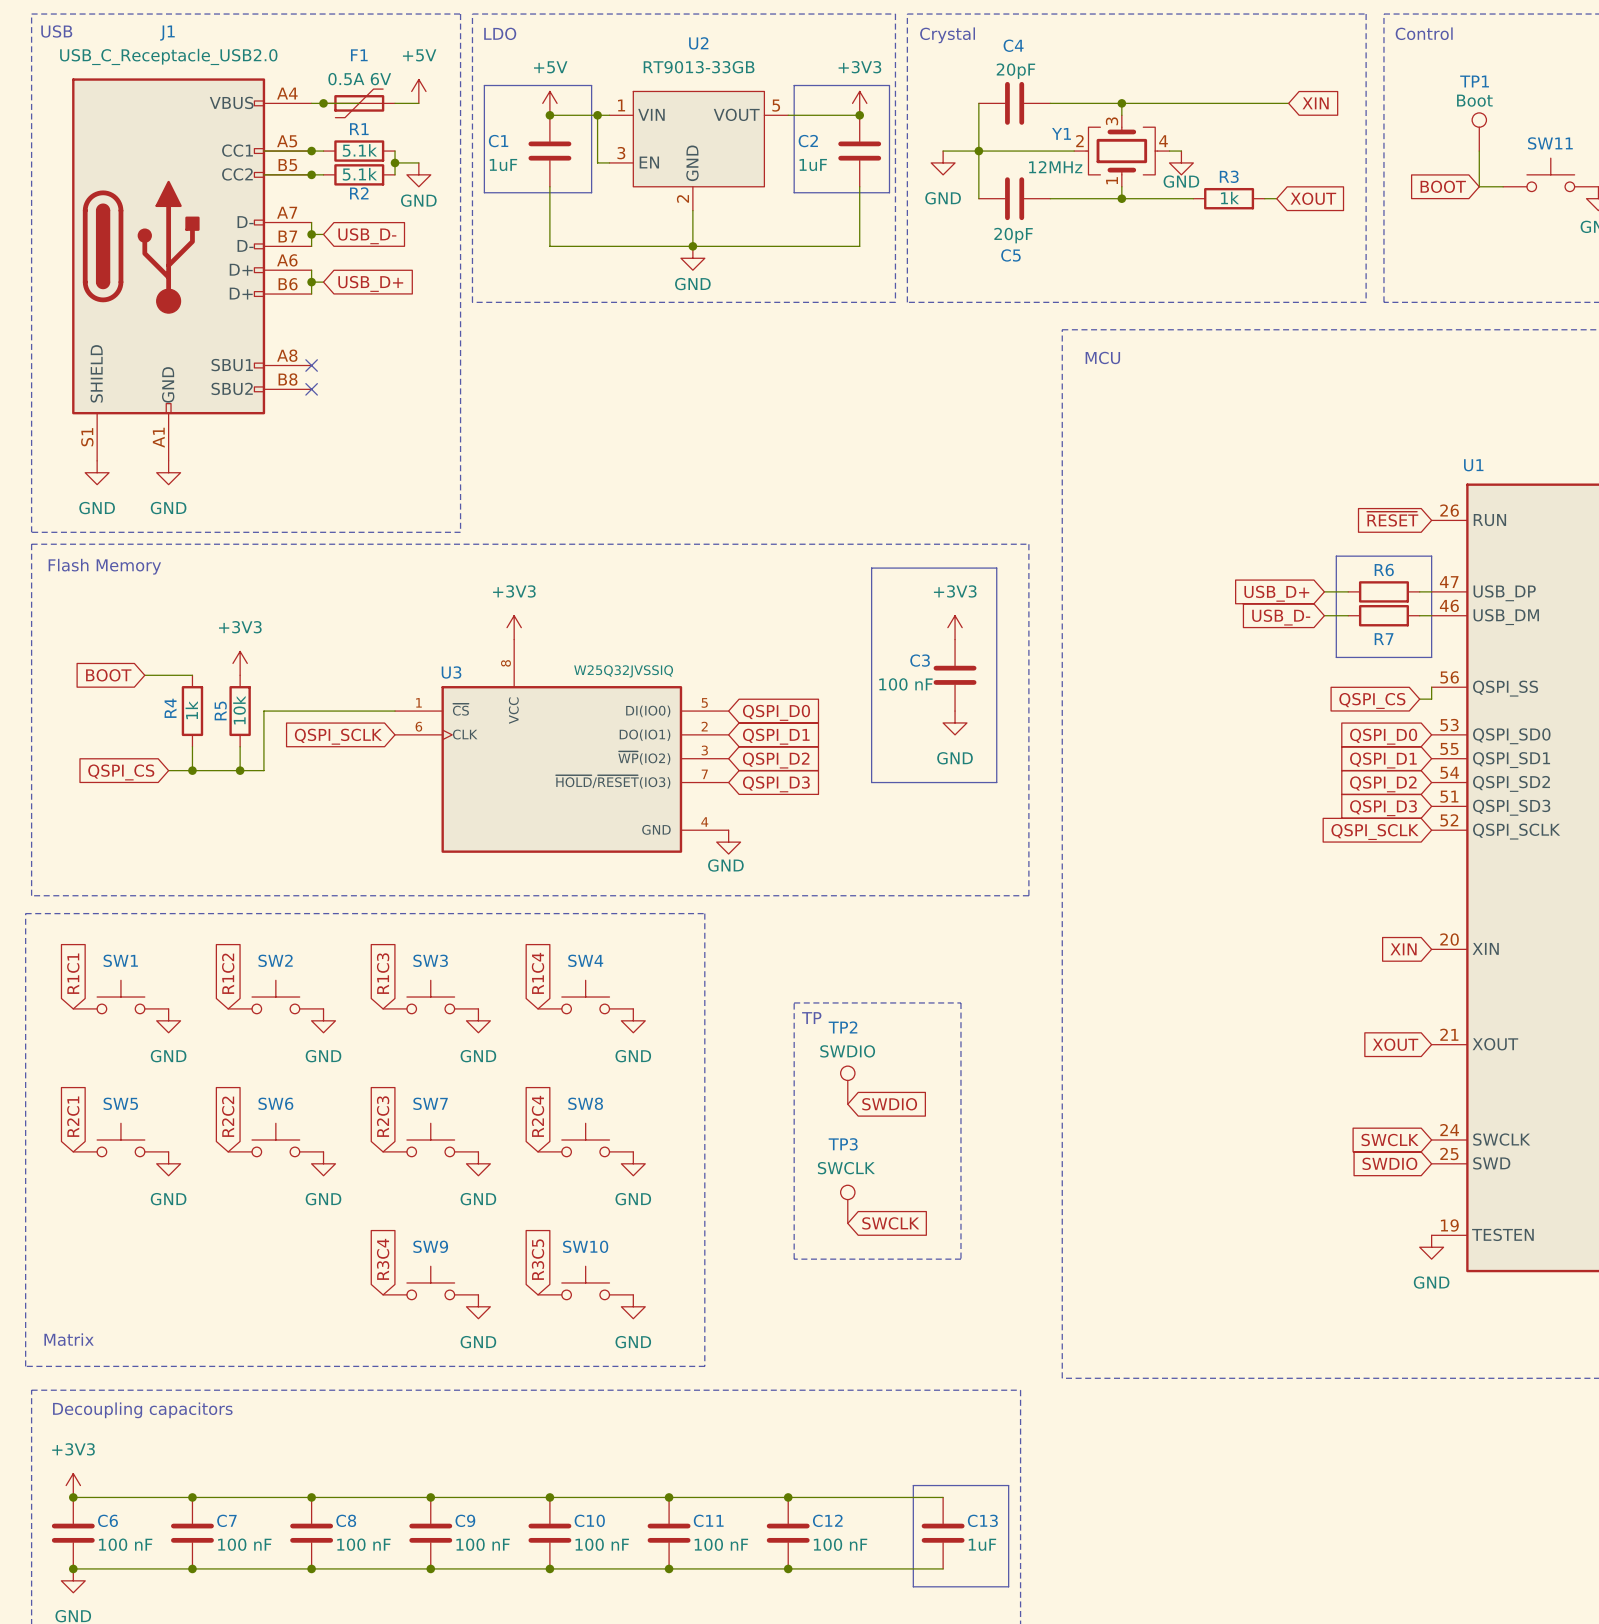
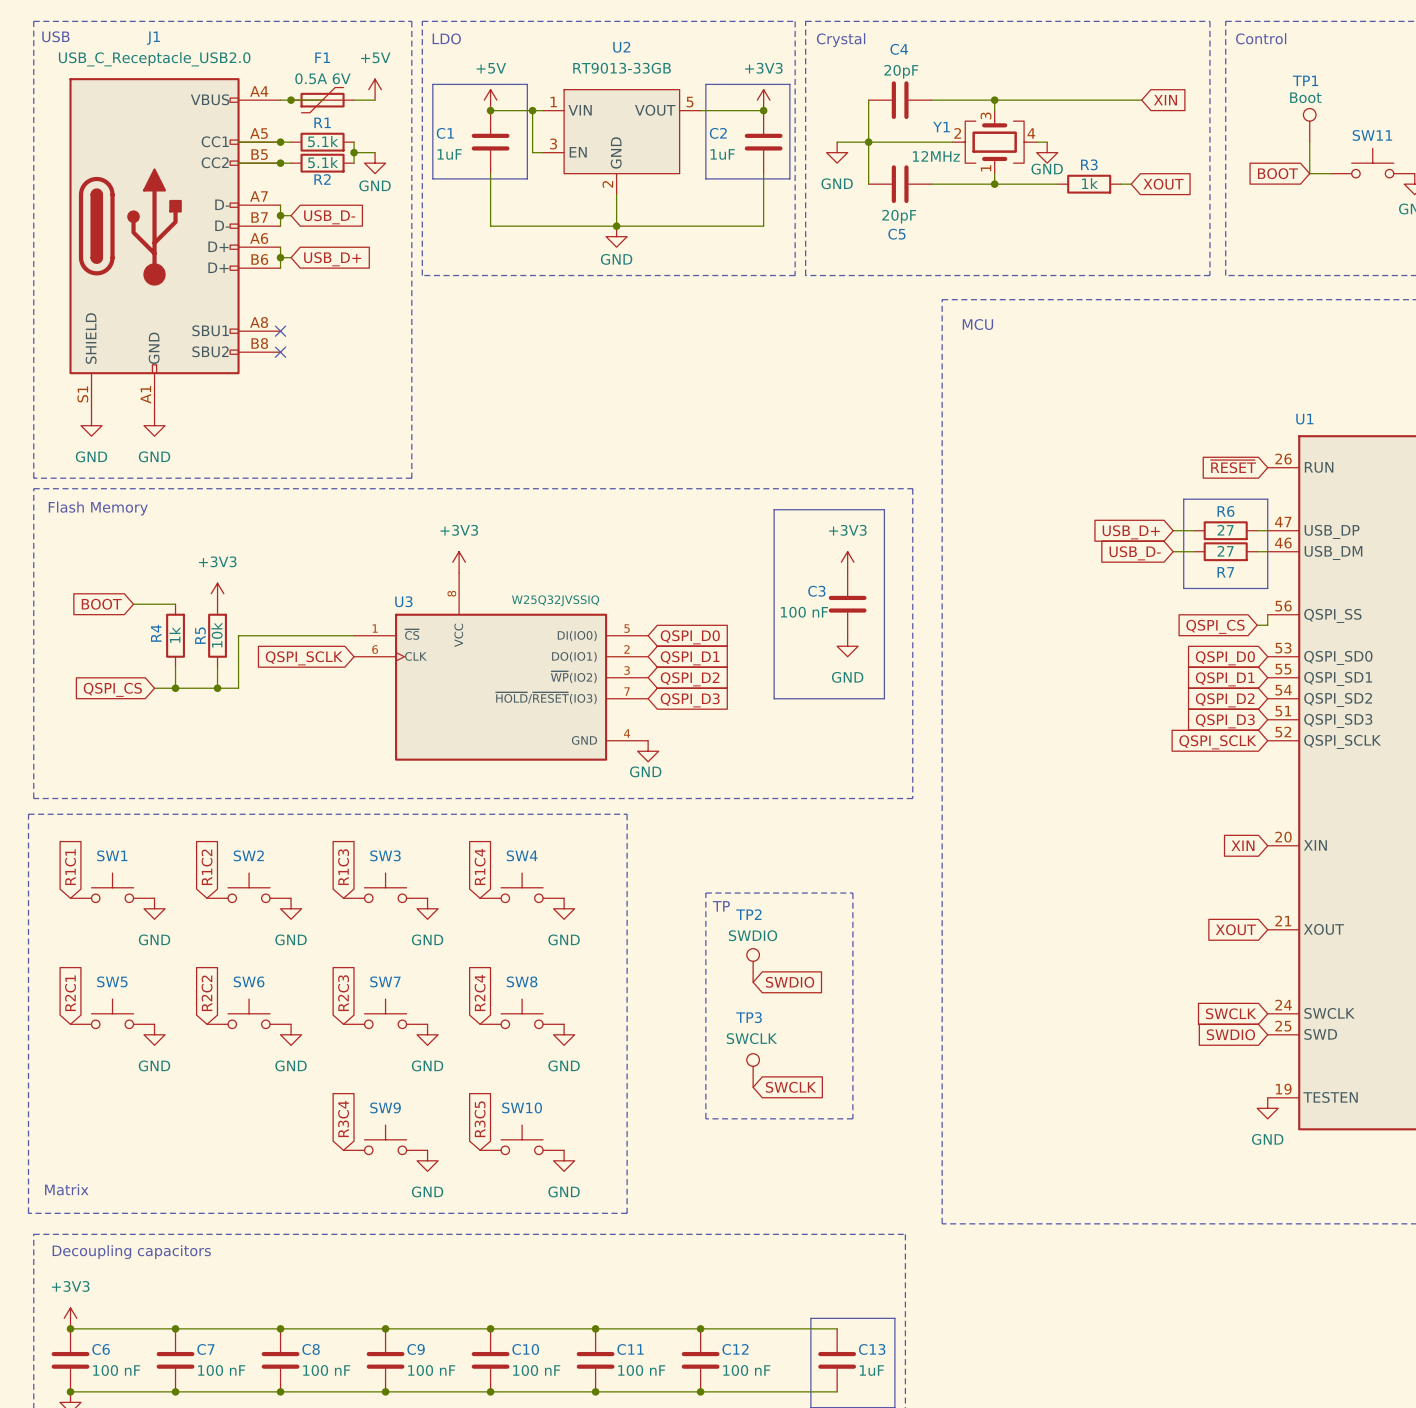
R6 value: none -> 27 (1225, 530)
R7 value: none -> 27 (1225, 551)

